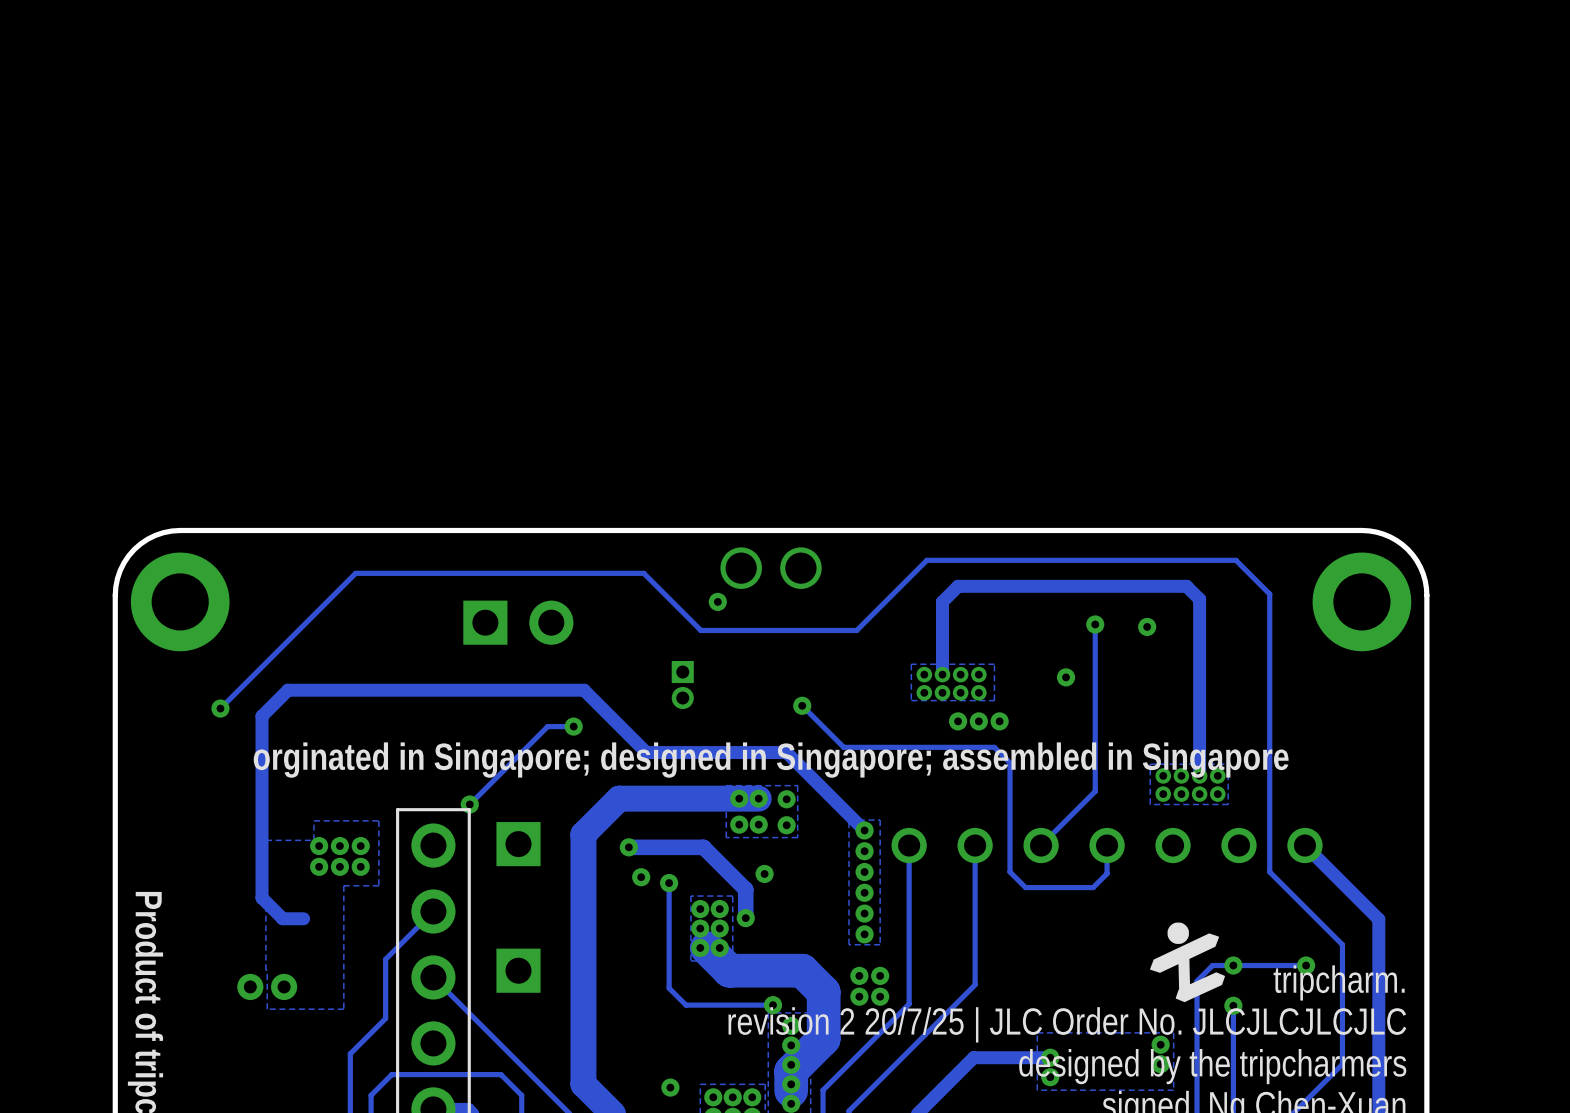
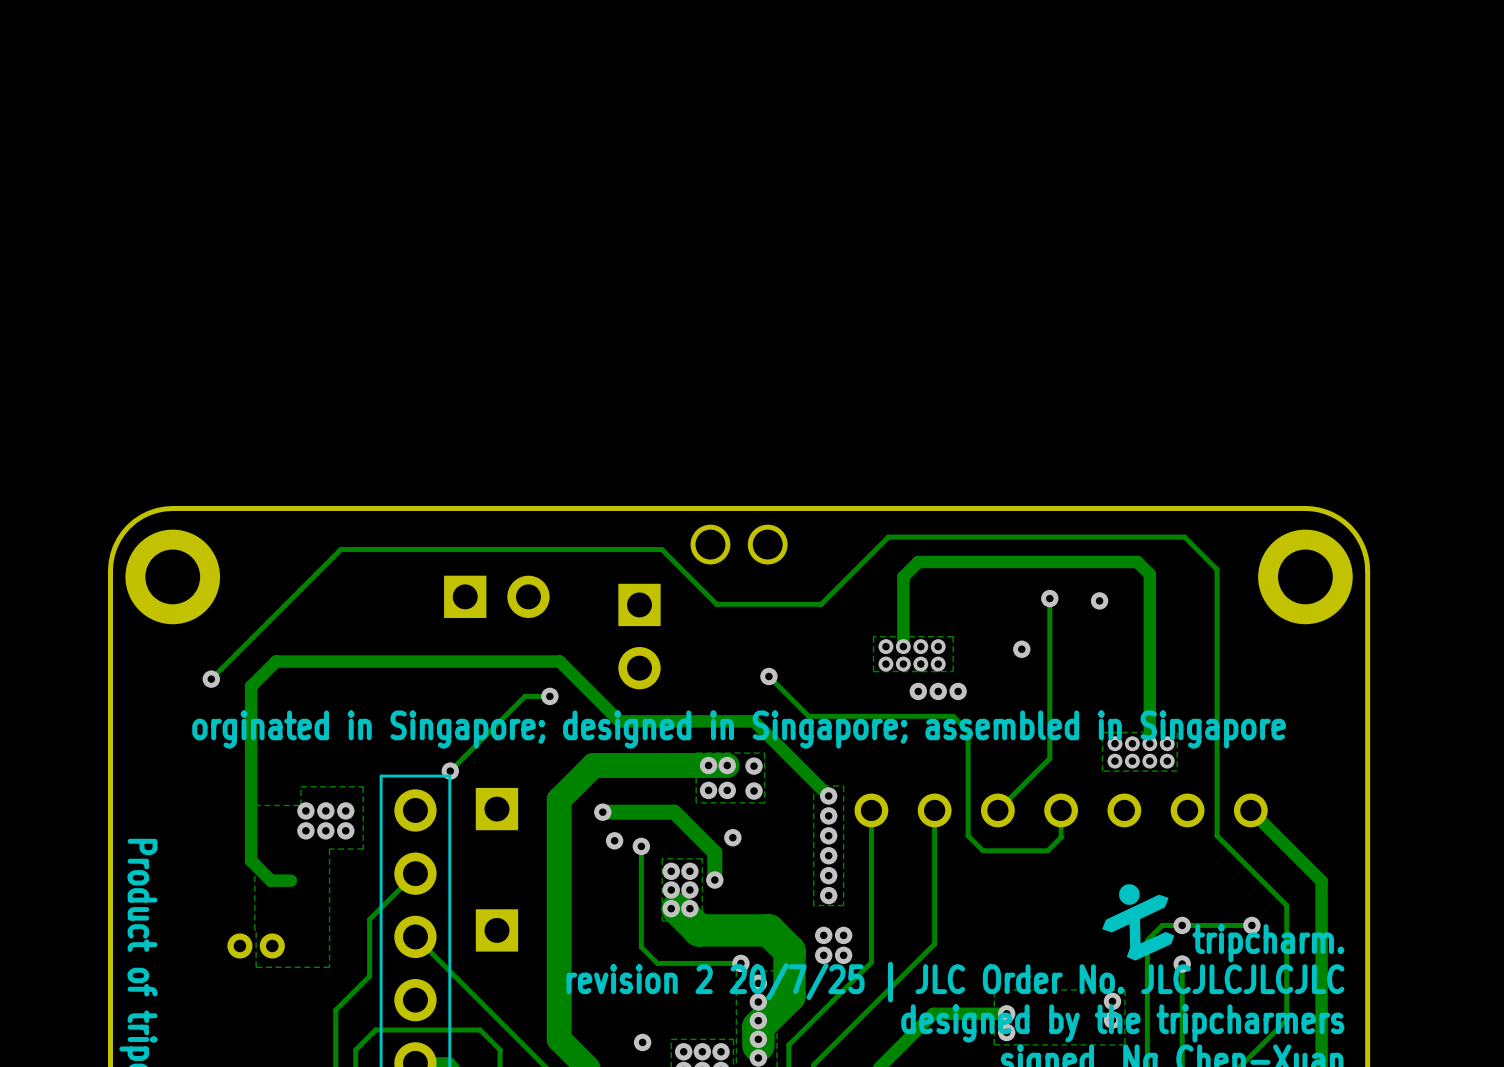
track: (643, 573) (700, 630) (747, 630) -> (617, 549) (661, 549) (716, 604)
via: (717, 601) -> none
part: none -> (639, 636)
part: (682, 685) -> none

